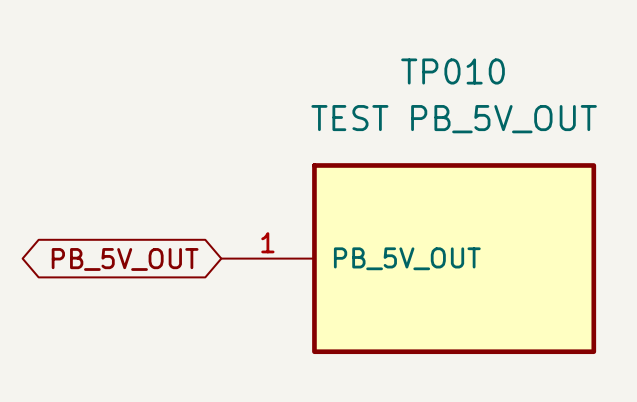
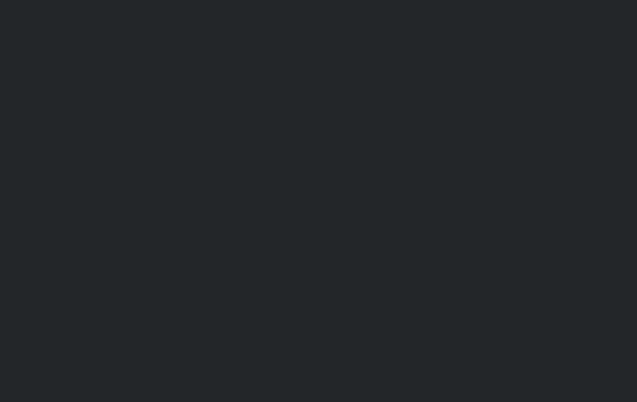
TP010: TEST PB_5V_OUT (408, 258) -> none
global label: PB_5V_OUT (125, 259) -> none

